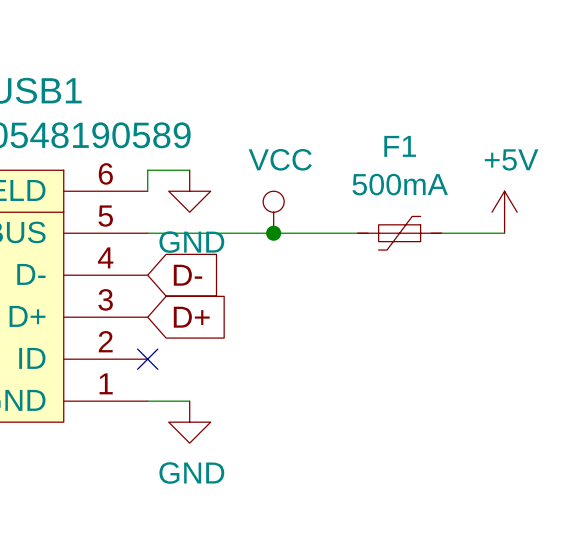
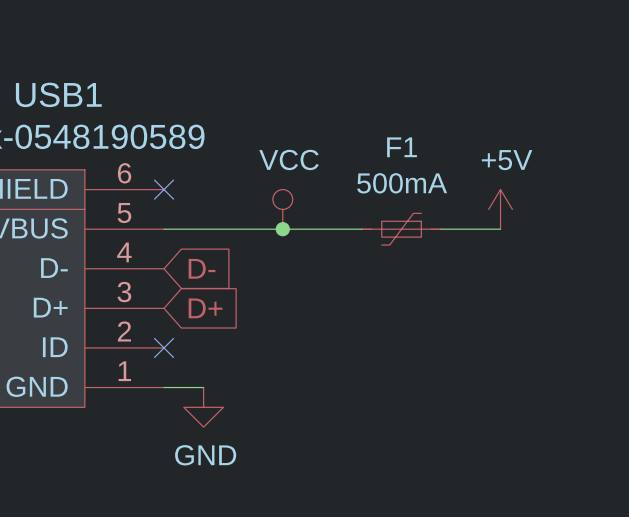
wire: (189, 170) (147, 170) (147, 191) -> none
no-connect mark: none -> (164, 189)
power symbol: GND (189, 191) -> none

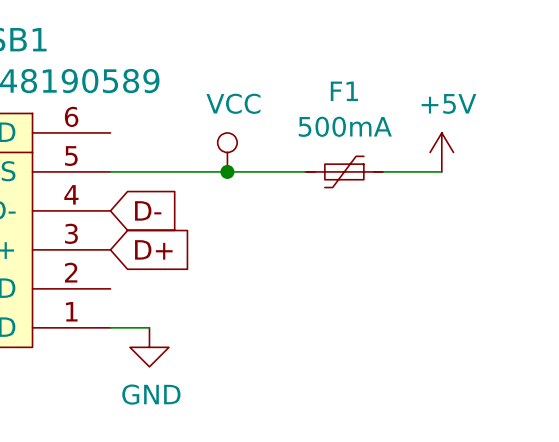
no-connect mark: (164, 189) -> none
no-connect mark: (164, 347) -> none

